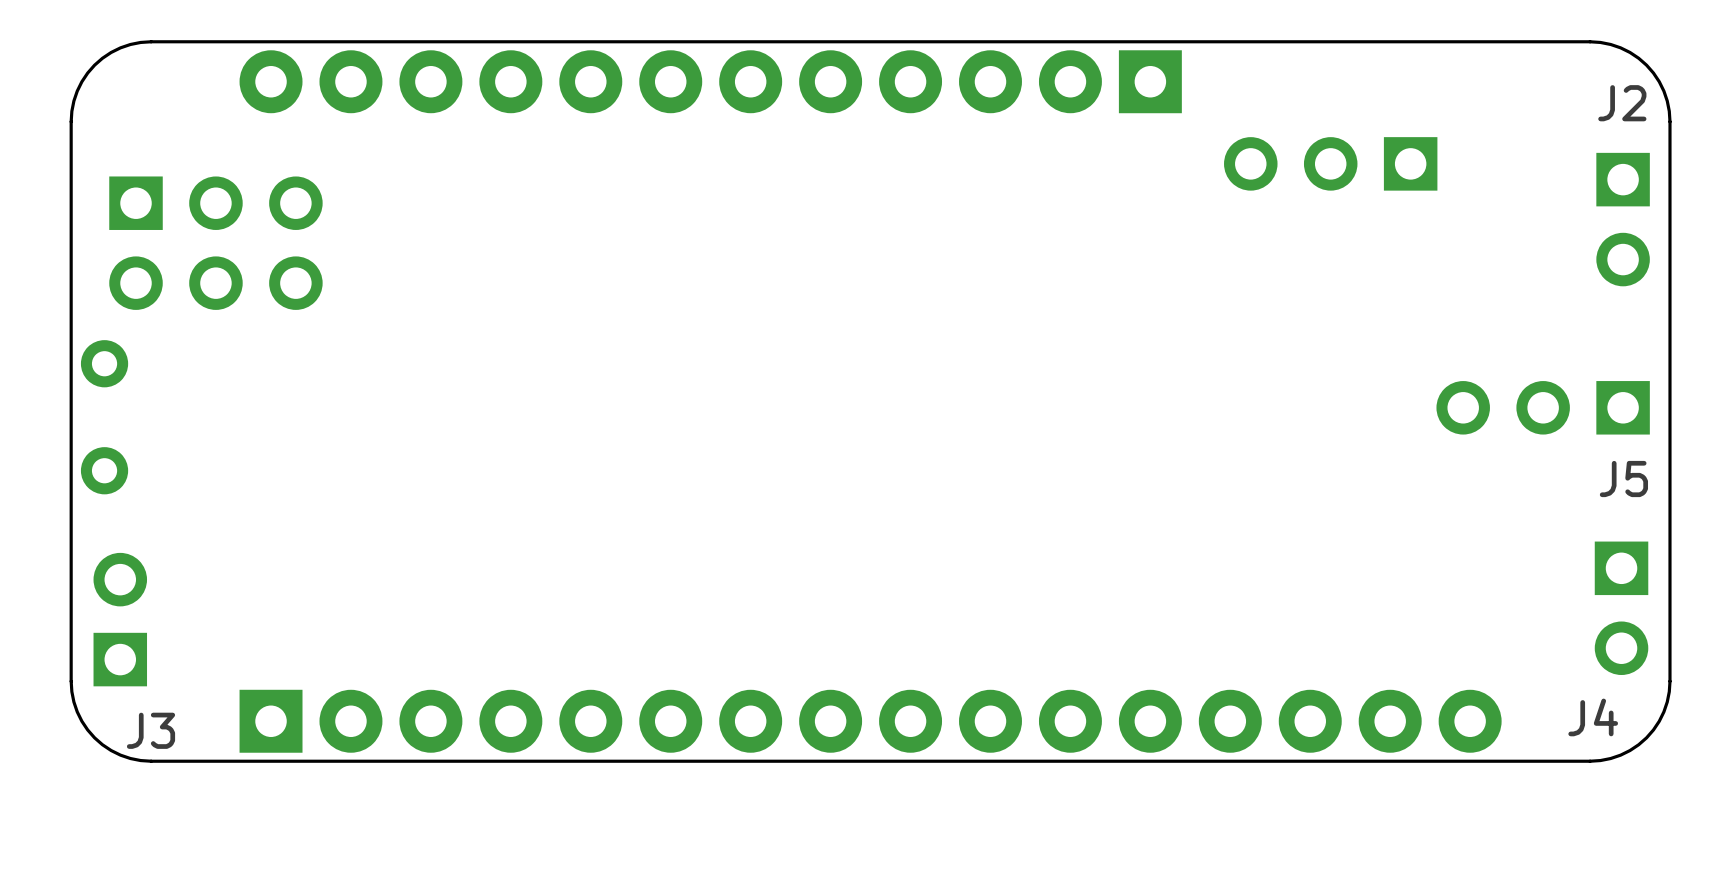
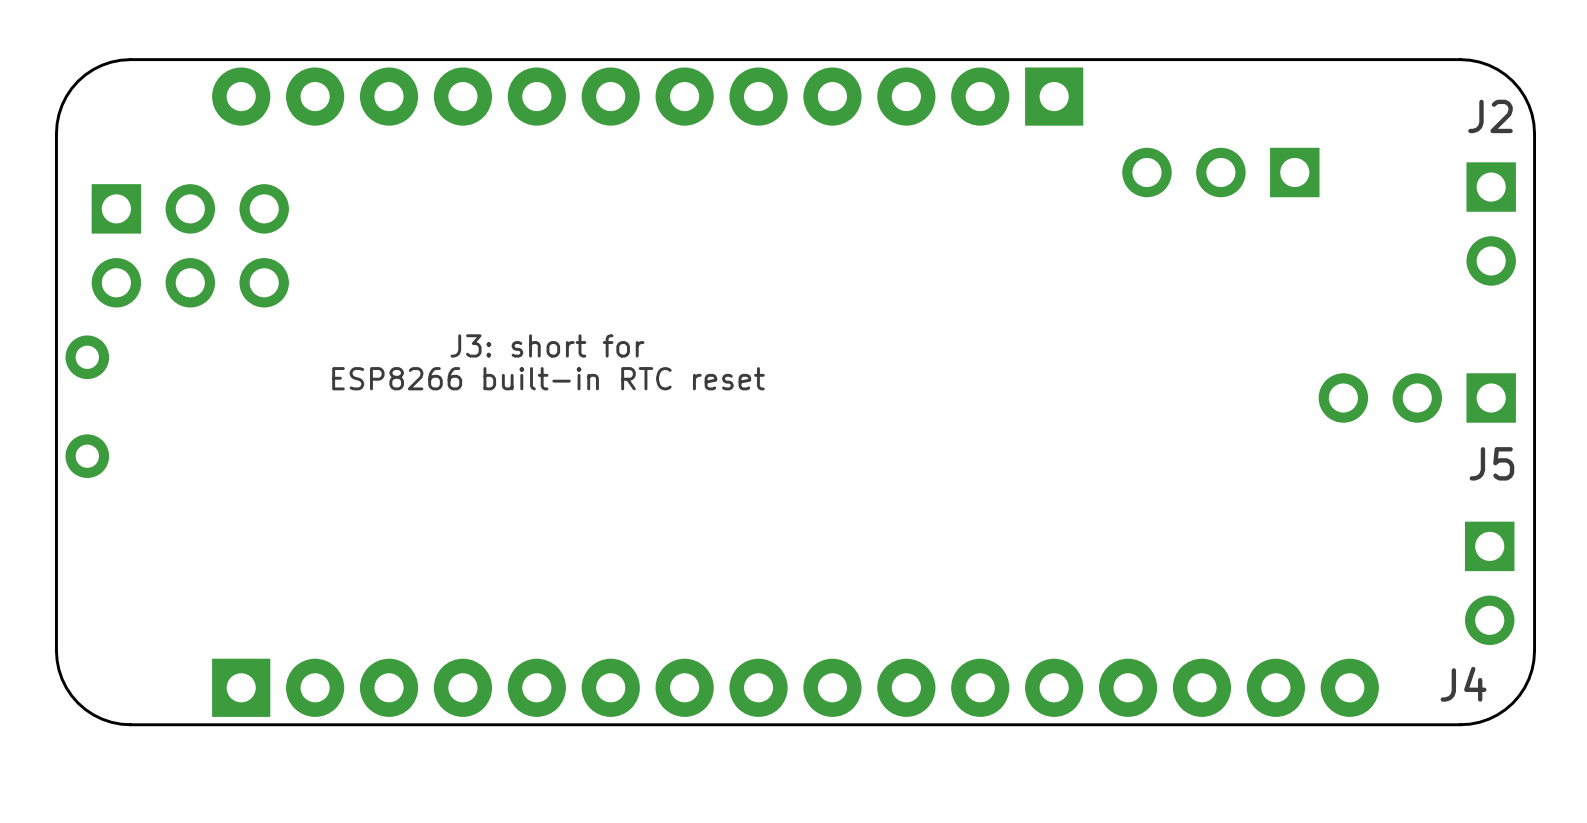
text: none -> J3: short for (547, 345)
text: none -> ESP8266 built-in RTC reset (548, 378)
J3: (120, 619) -> none

